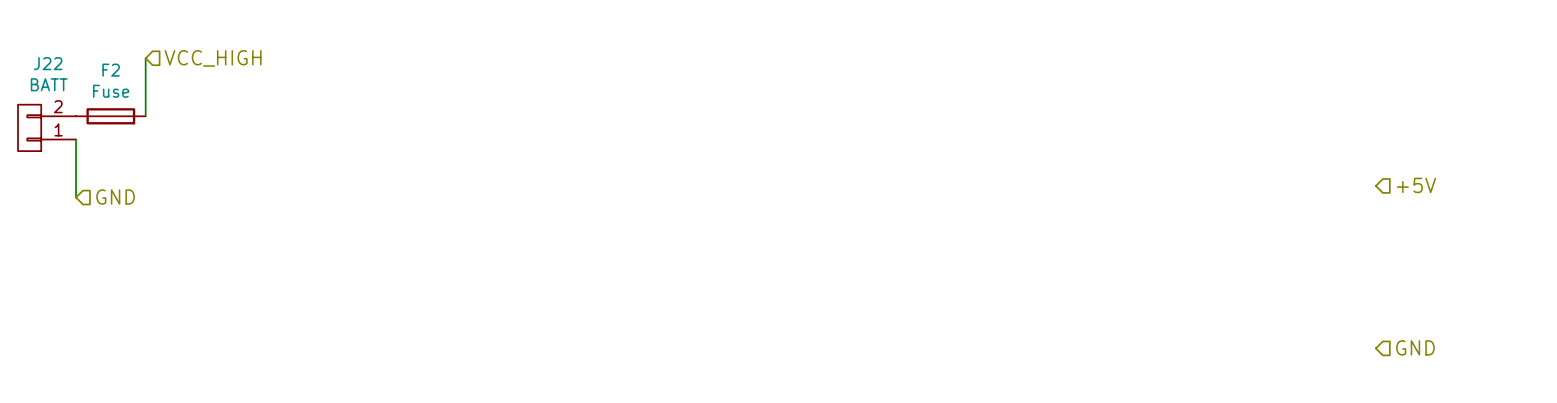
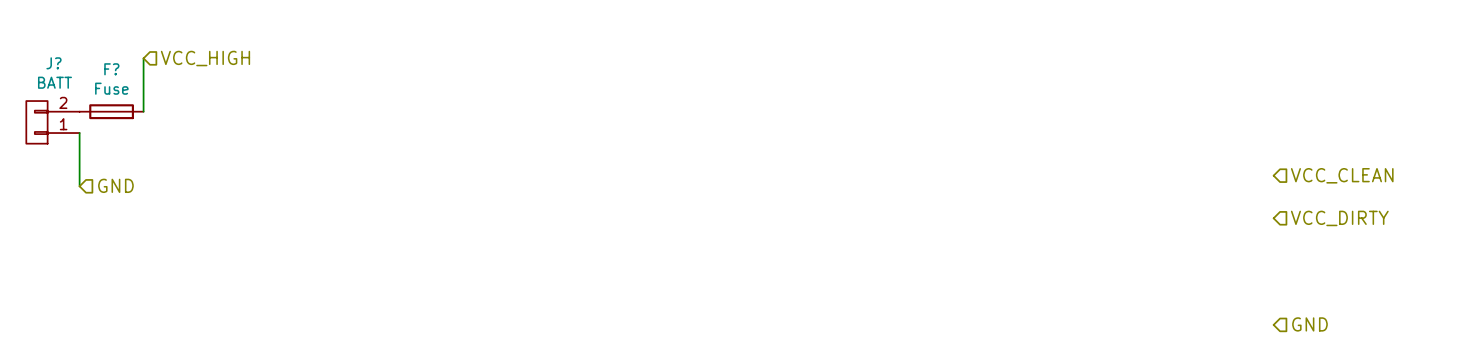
J22 name: J22 (48, 63) -> J? (53, 63)
F2 name: F2 (111, 70) -> F? (111, 69)
hierarchical label: +5V (1416, 185) -> VCC_CLEAN (1342, 175)
hierarchical label: none -> VCC_DIRTY (1339, 218)

